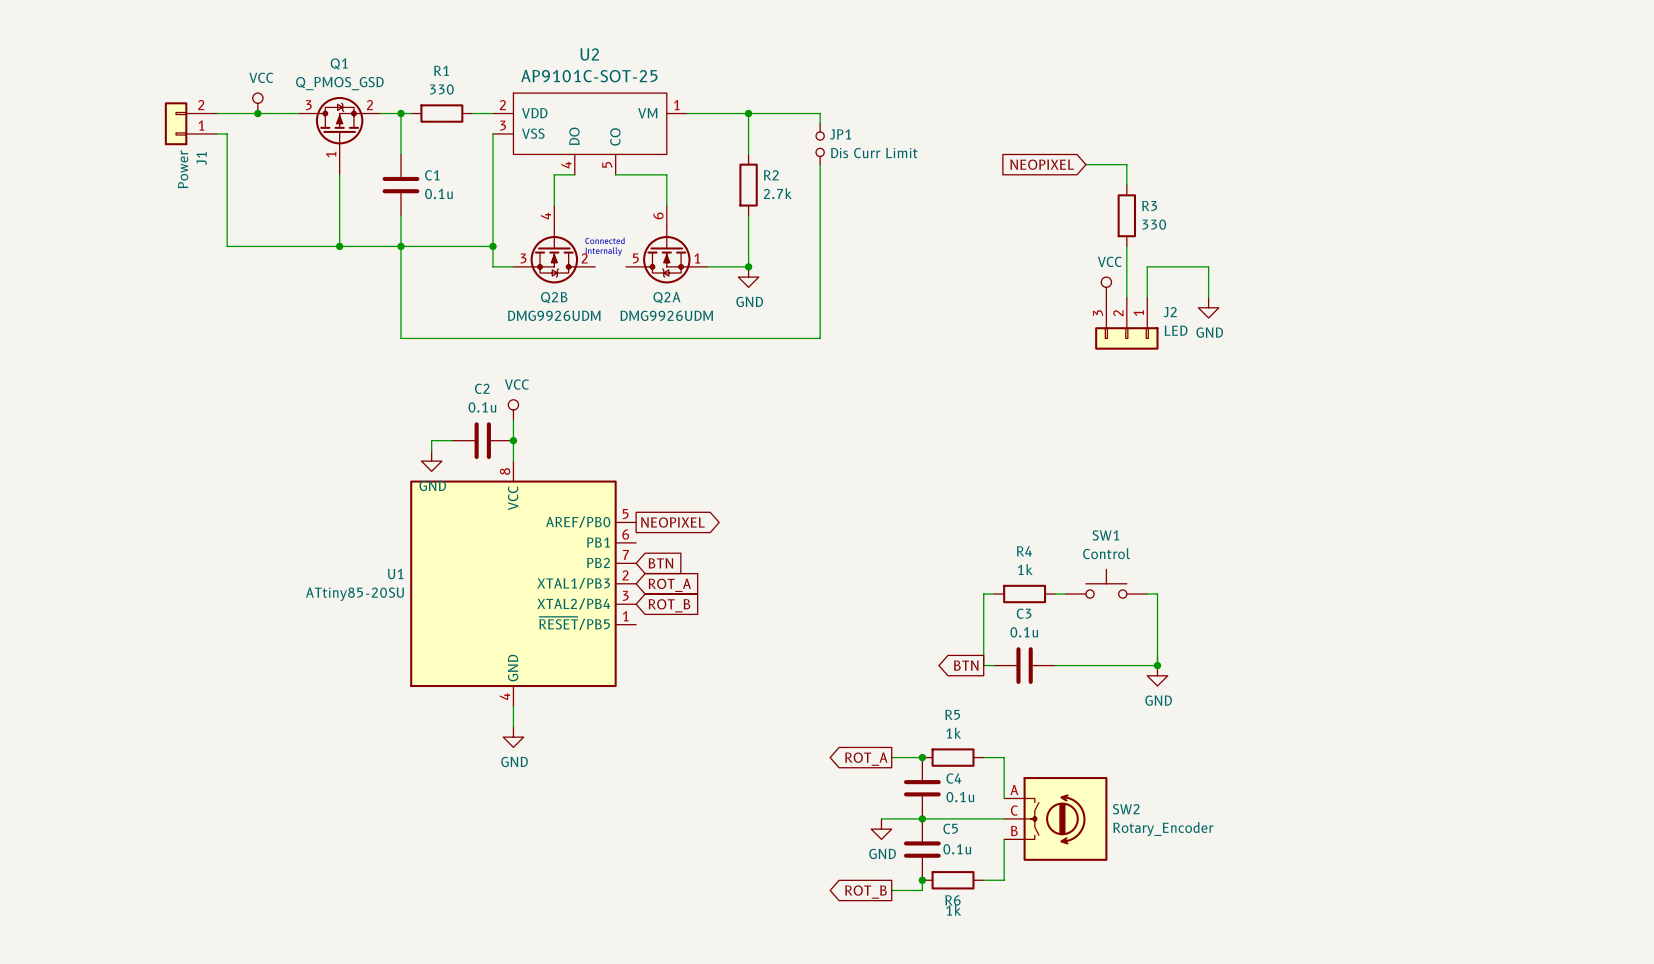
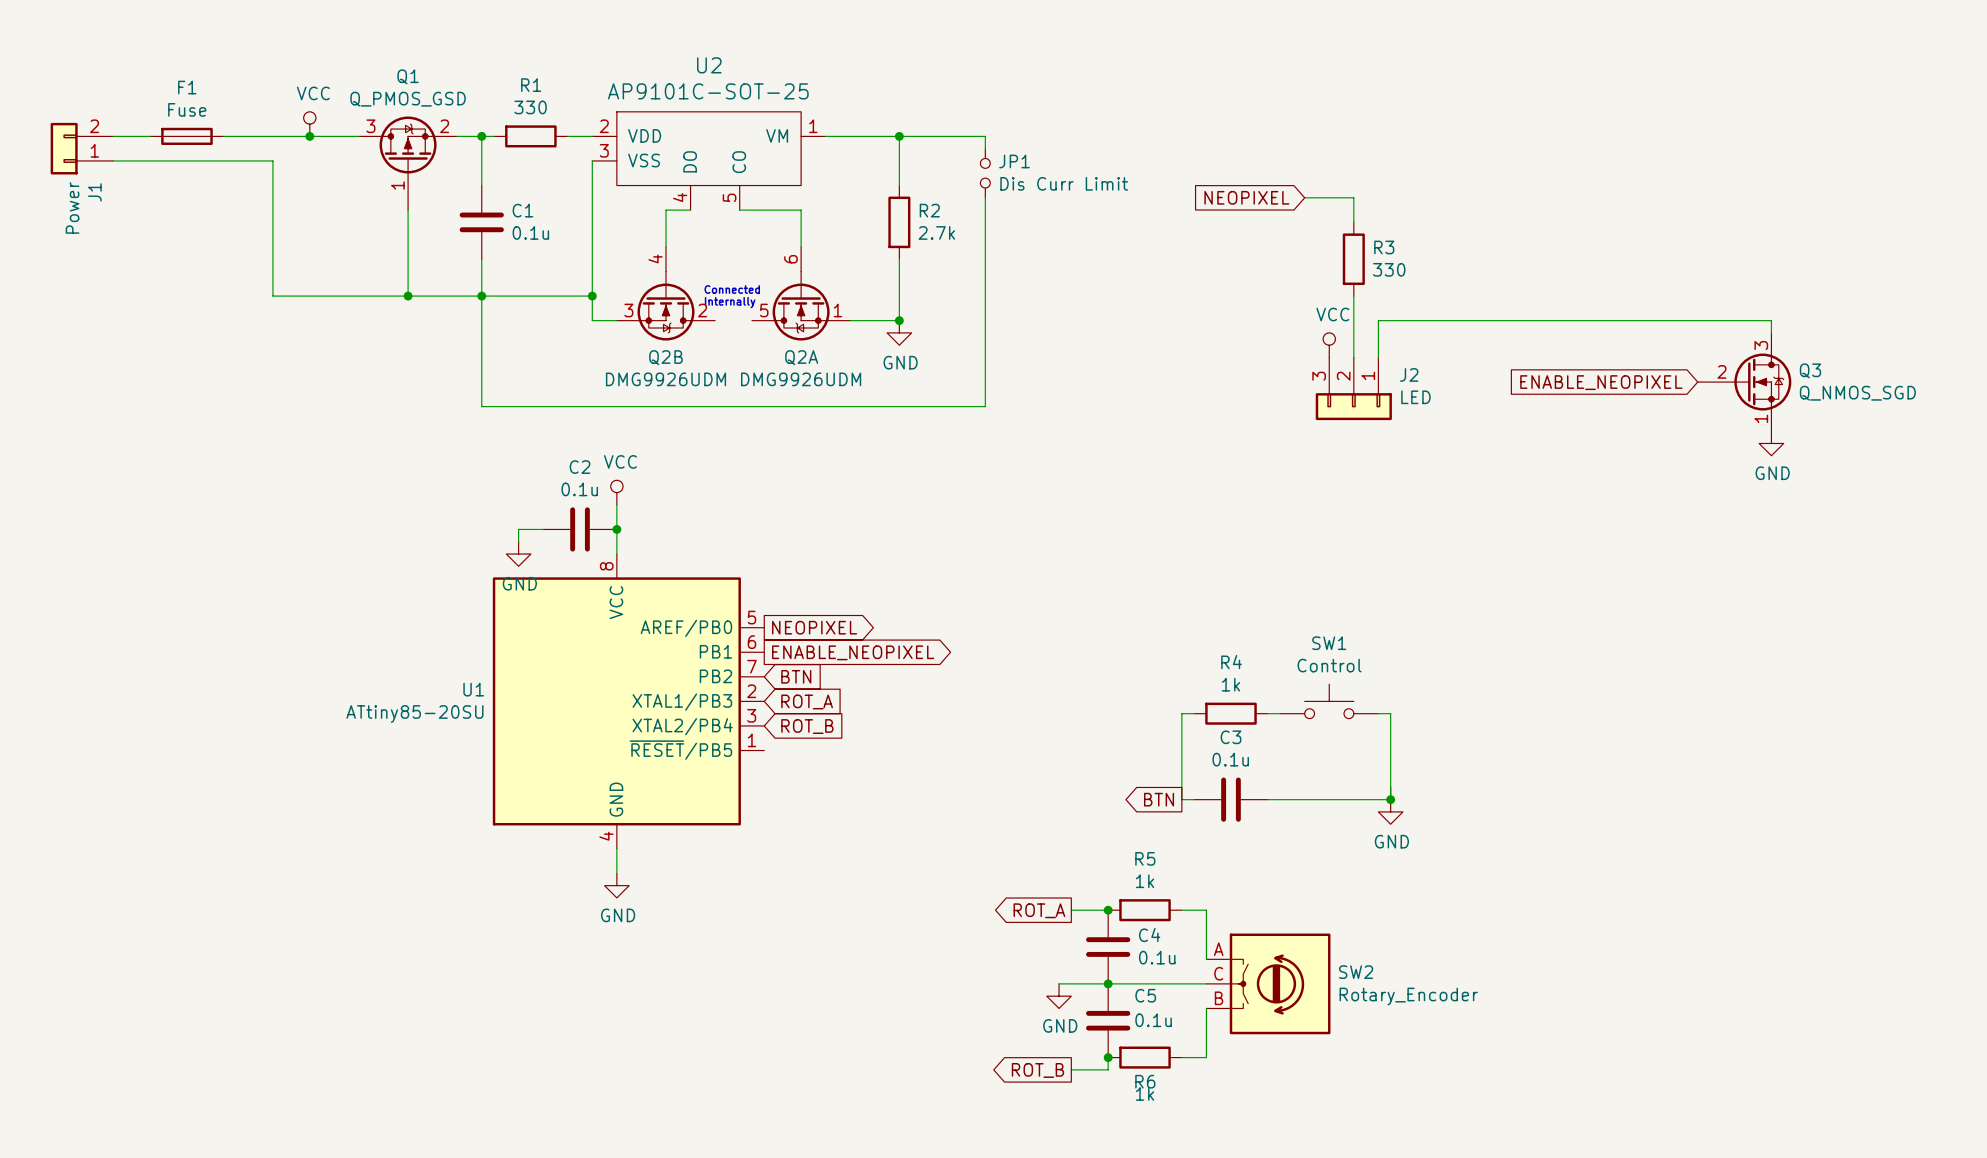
wire: none -> (113, 136) (150, 136)
F1: none -> Fuse (186, 136)
J1 position: (190, 123) -> (81, 148)
wire: none -> (113, 160) (260, 160)
wire: (1208, 266) (1208, 297) -> (1452, 320) (1771, 320) (1771, 332)
power symbol: GND (1208, 307) -> none
Q3: none -> Q_NMOS_SGD (1744, 382)
global label: none -> ENABLE_NEOPIXEL (1601, 382)
power symbol: none -> GND (1771, 443)
global label: none -> ENABLE_NEOPIXEL (853, 652)

